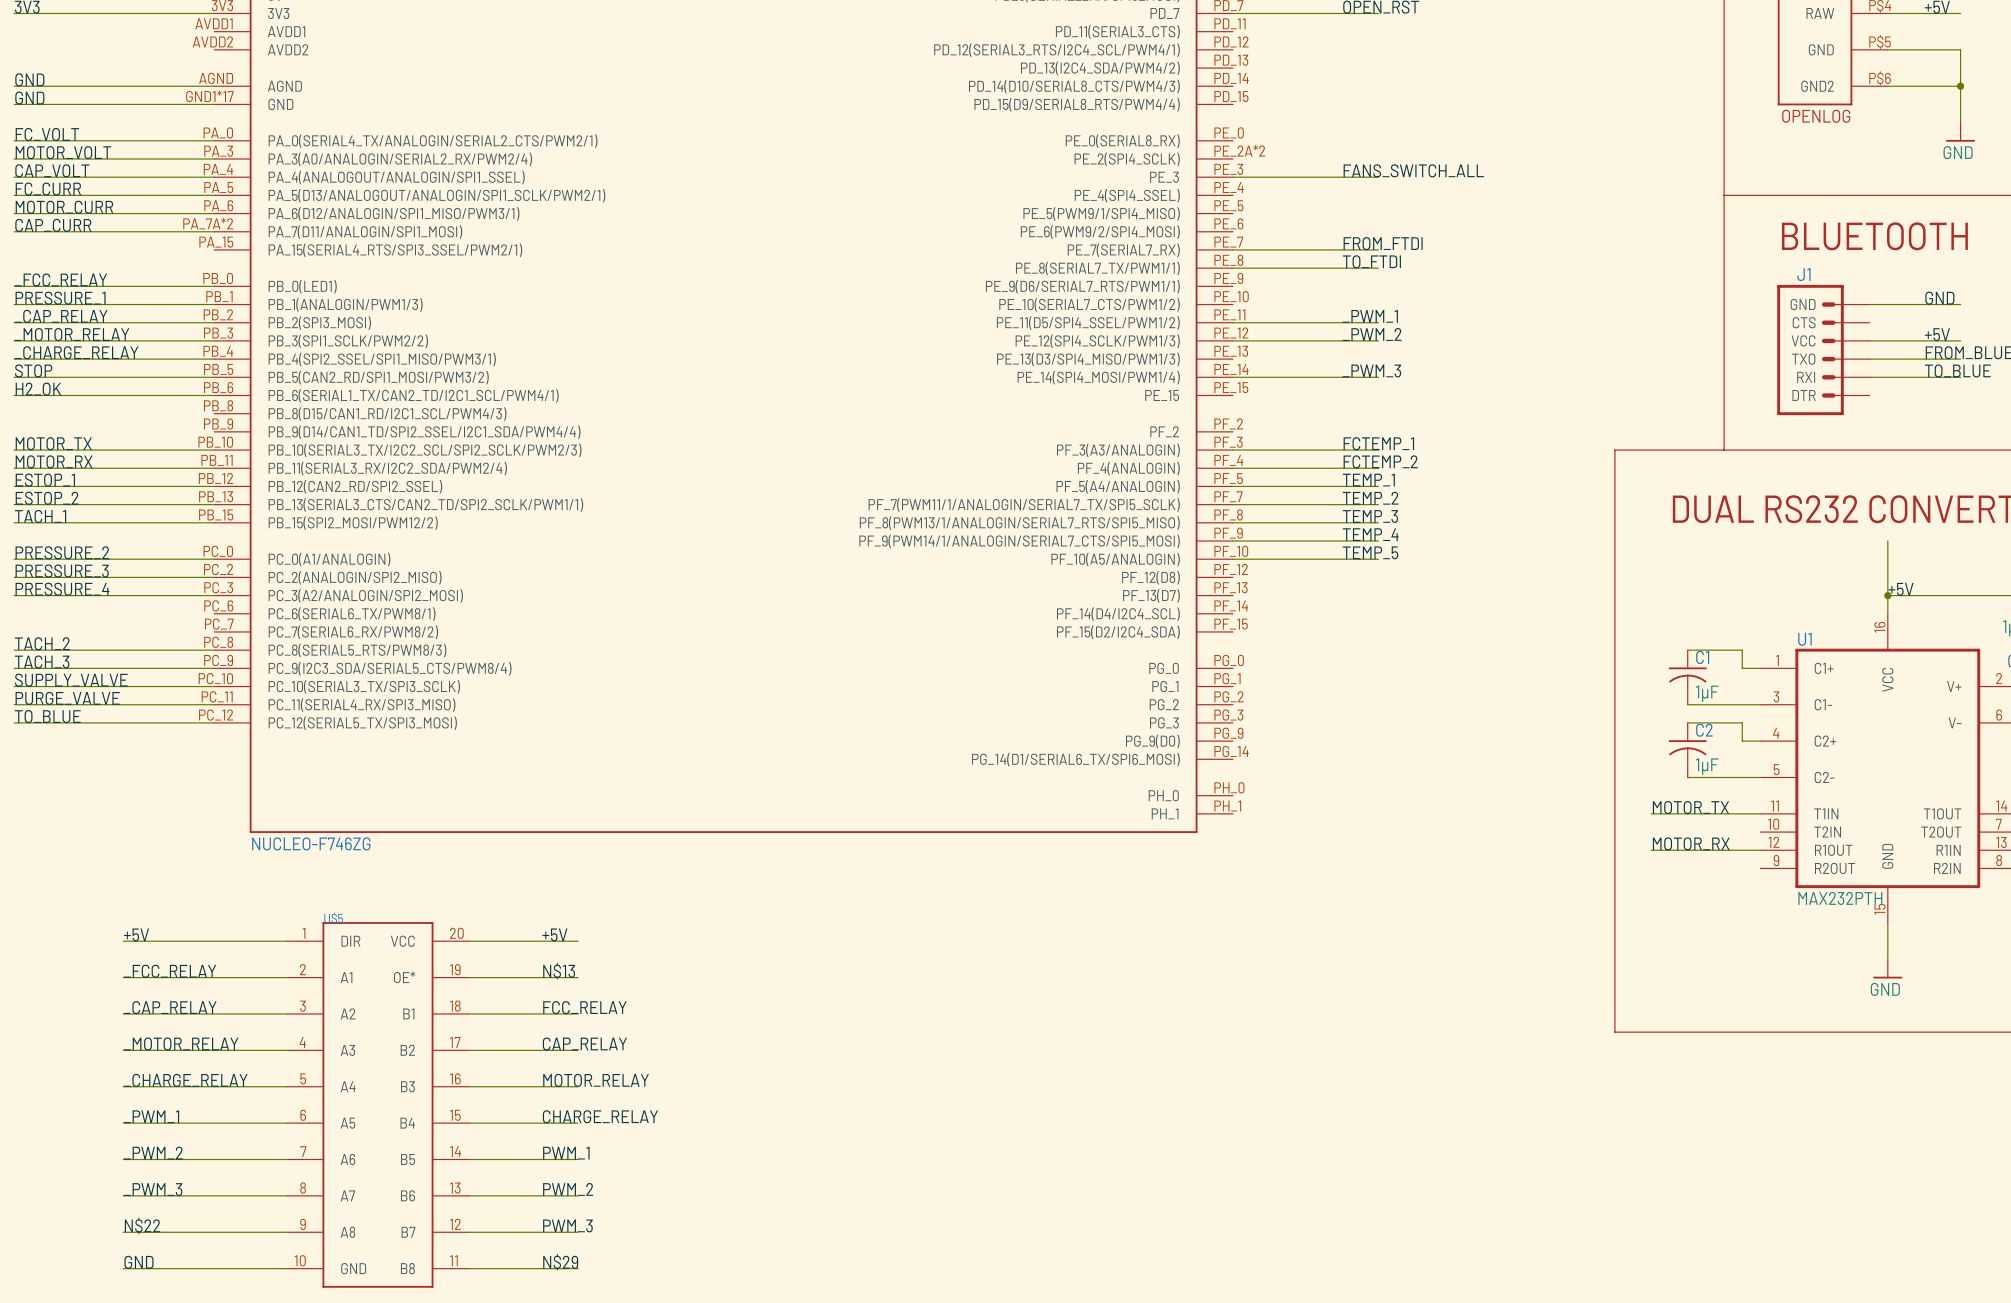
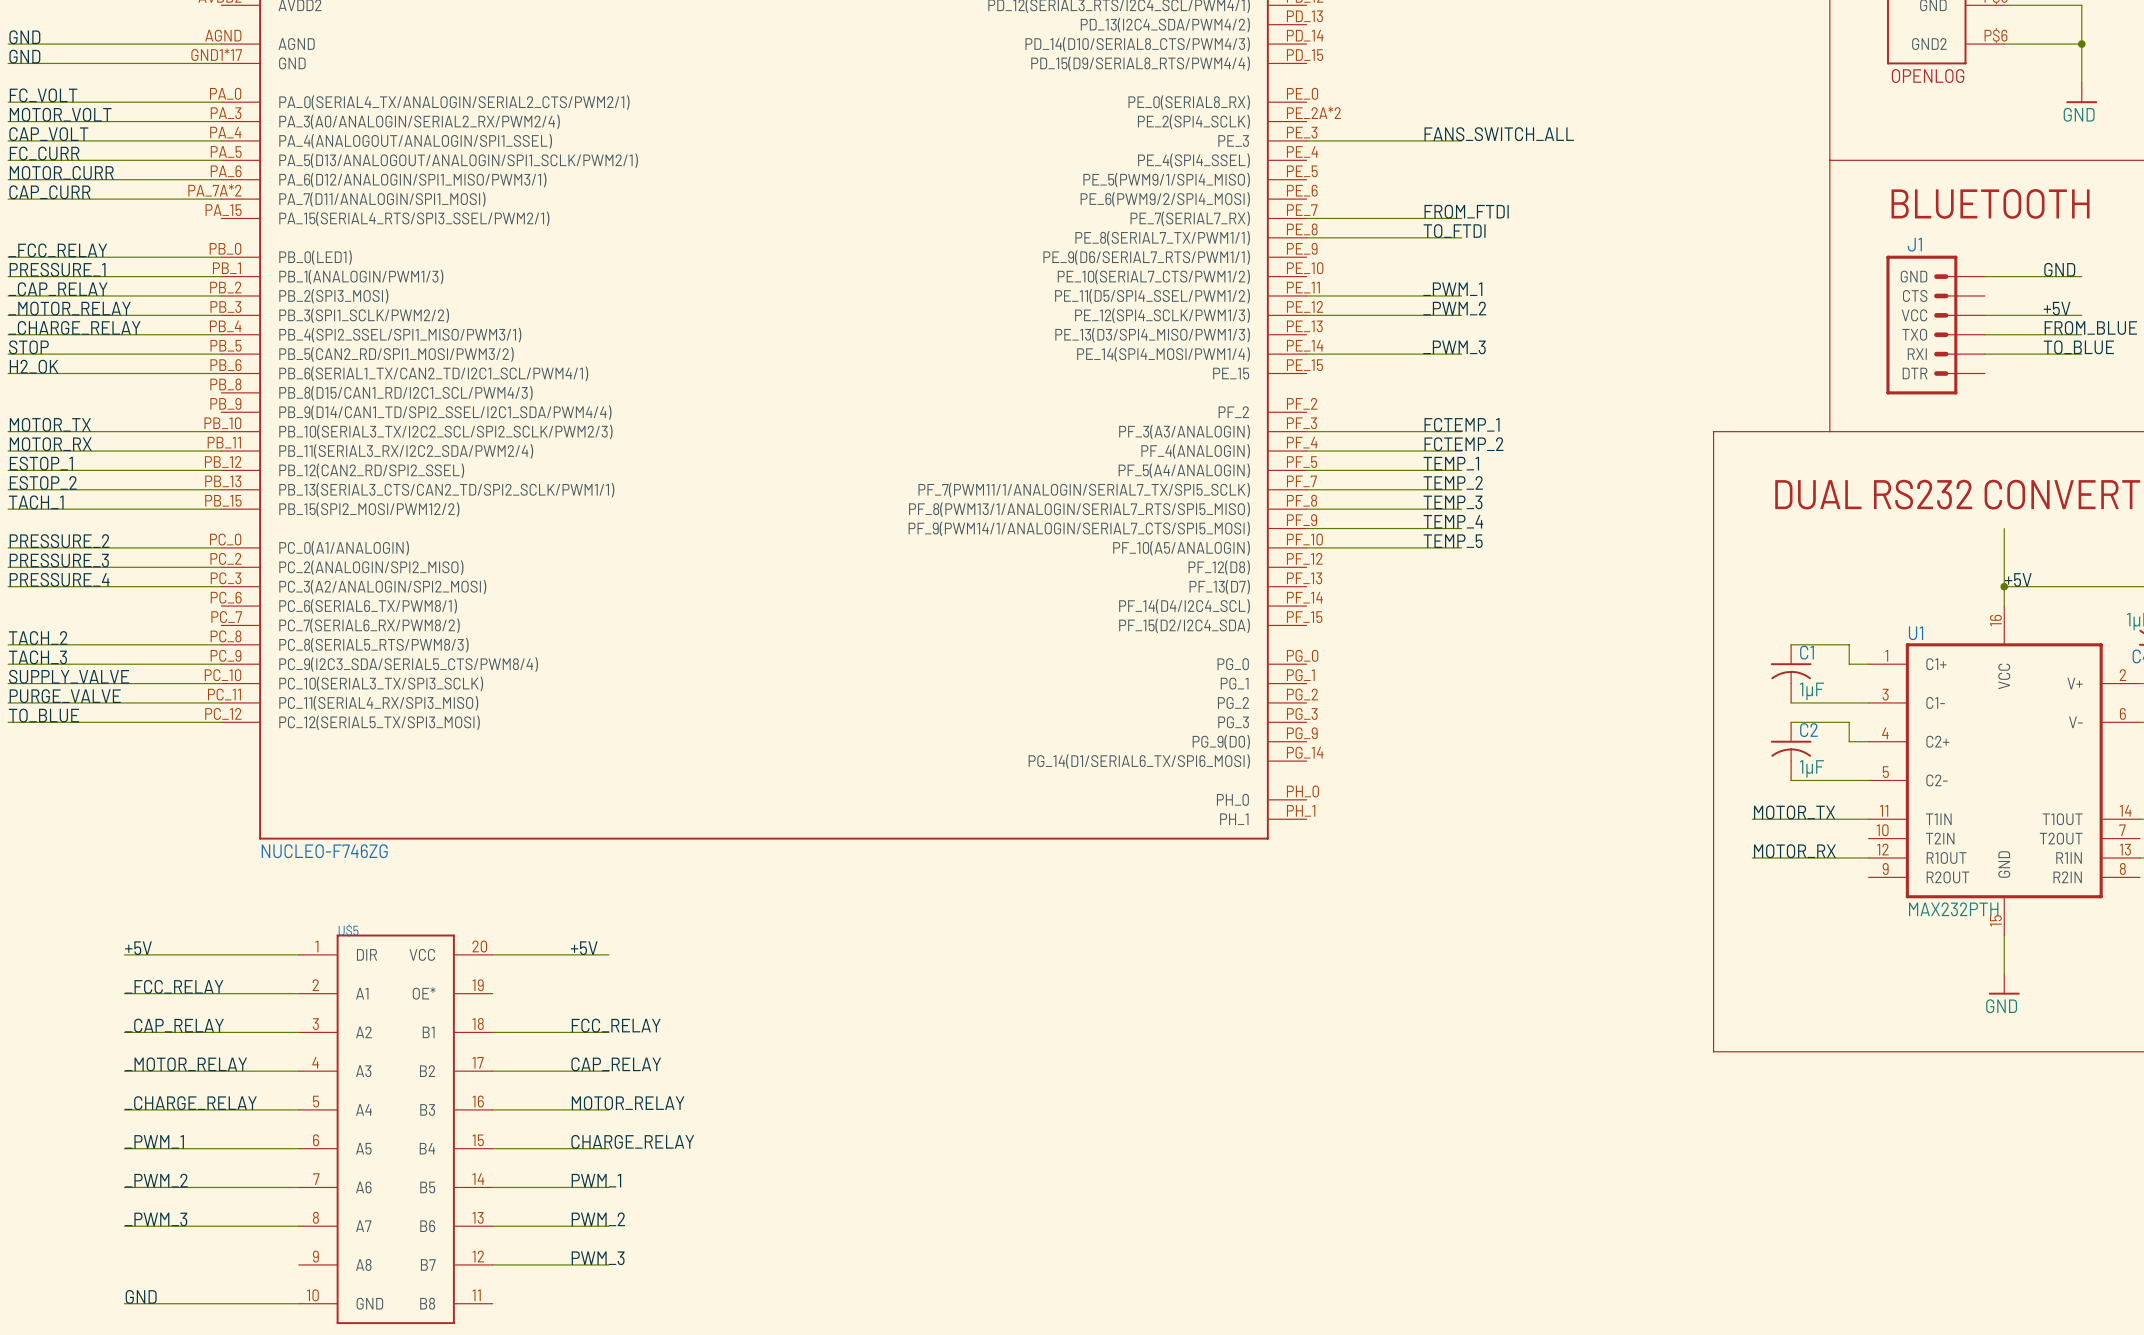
label: N$13 (559, 971) -> none
wire: (468, 977) (578, 977) -> none
label: N$22 (142, 1225) -> none
wire: (123, 1232) (287, 1232) -> none
label: N$29 (560, 1262) -> none
wire: (468, 1268) (578, 1268) -> none

